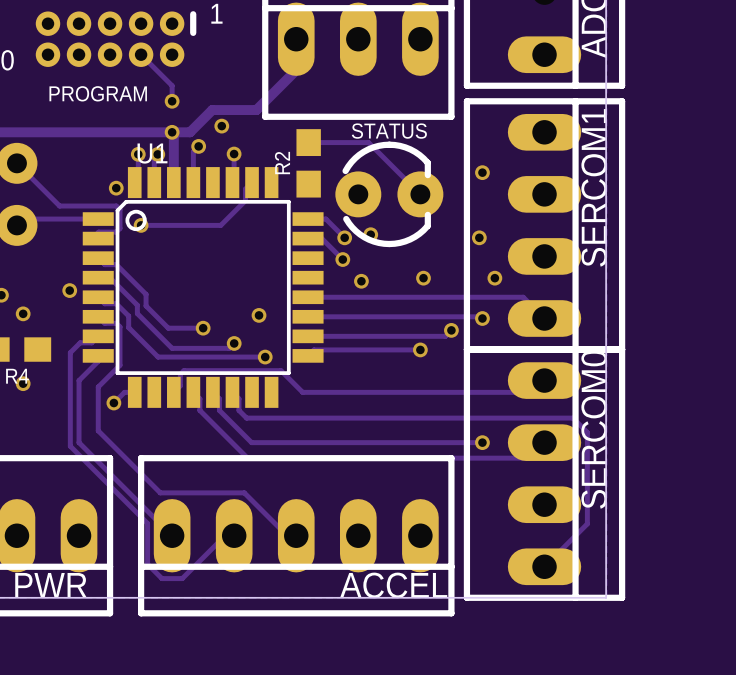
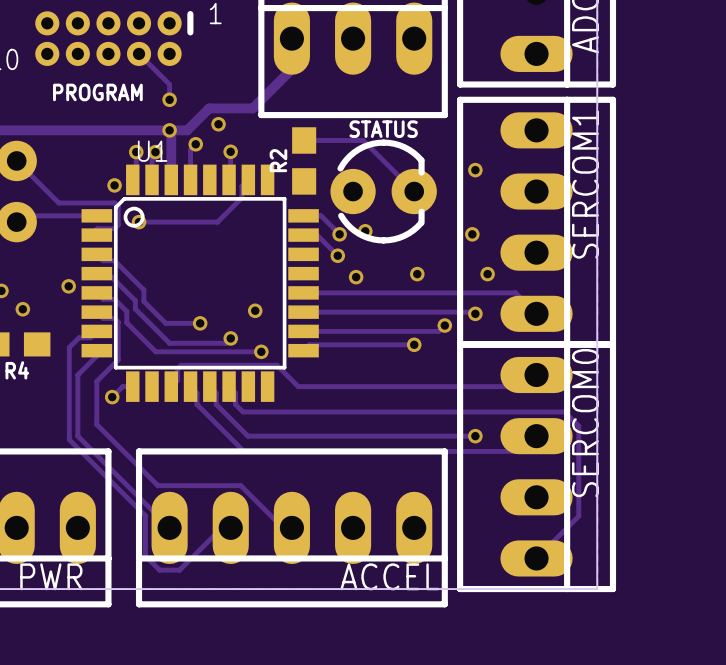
via: (23, 383) -> none

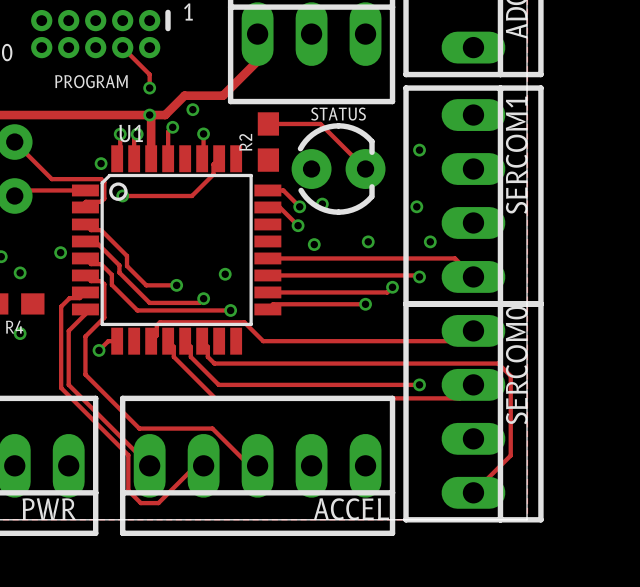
via: none -> (20, 333)

